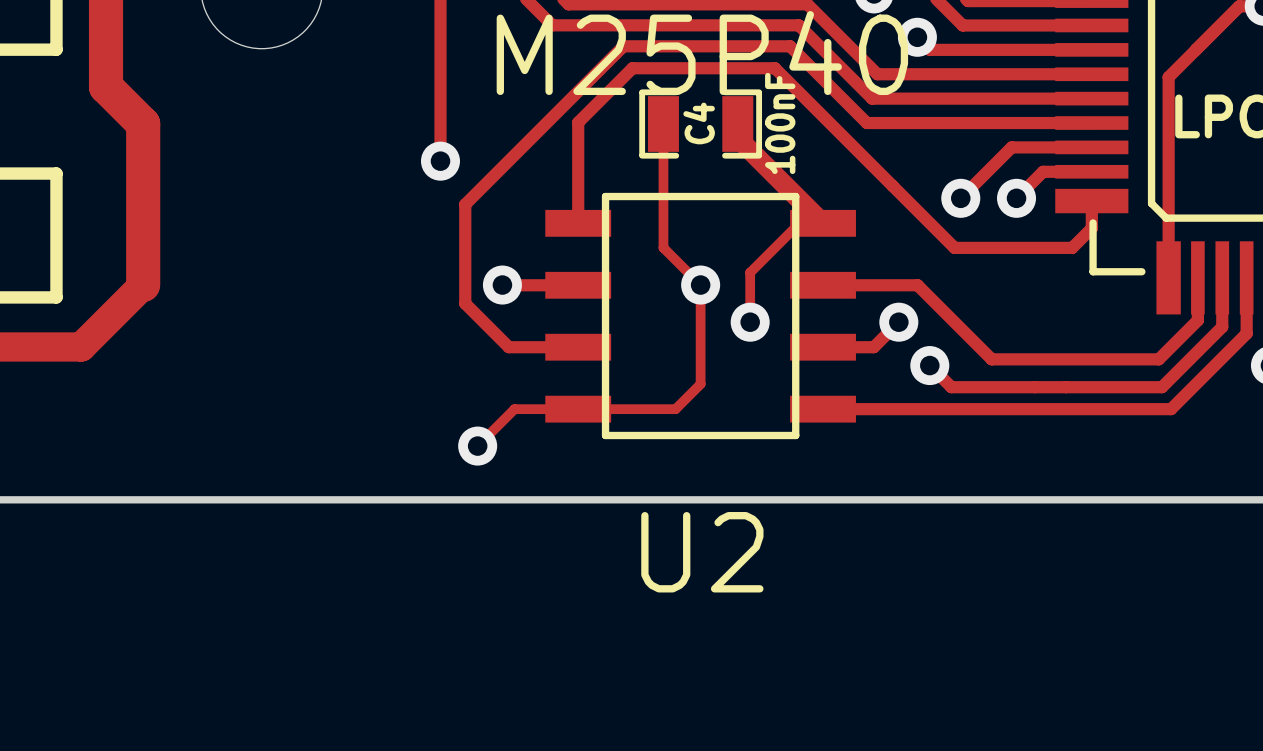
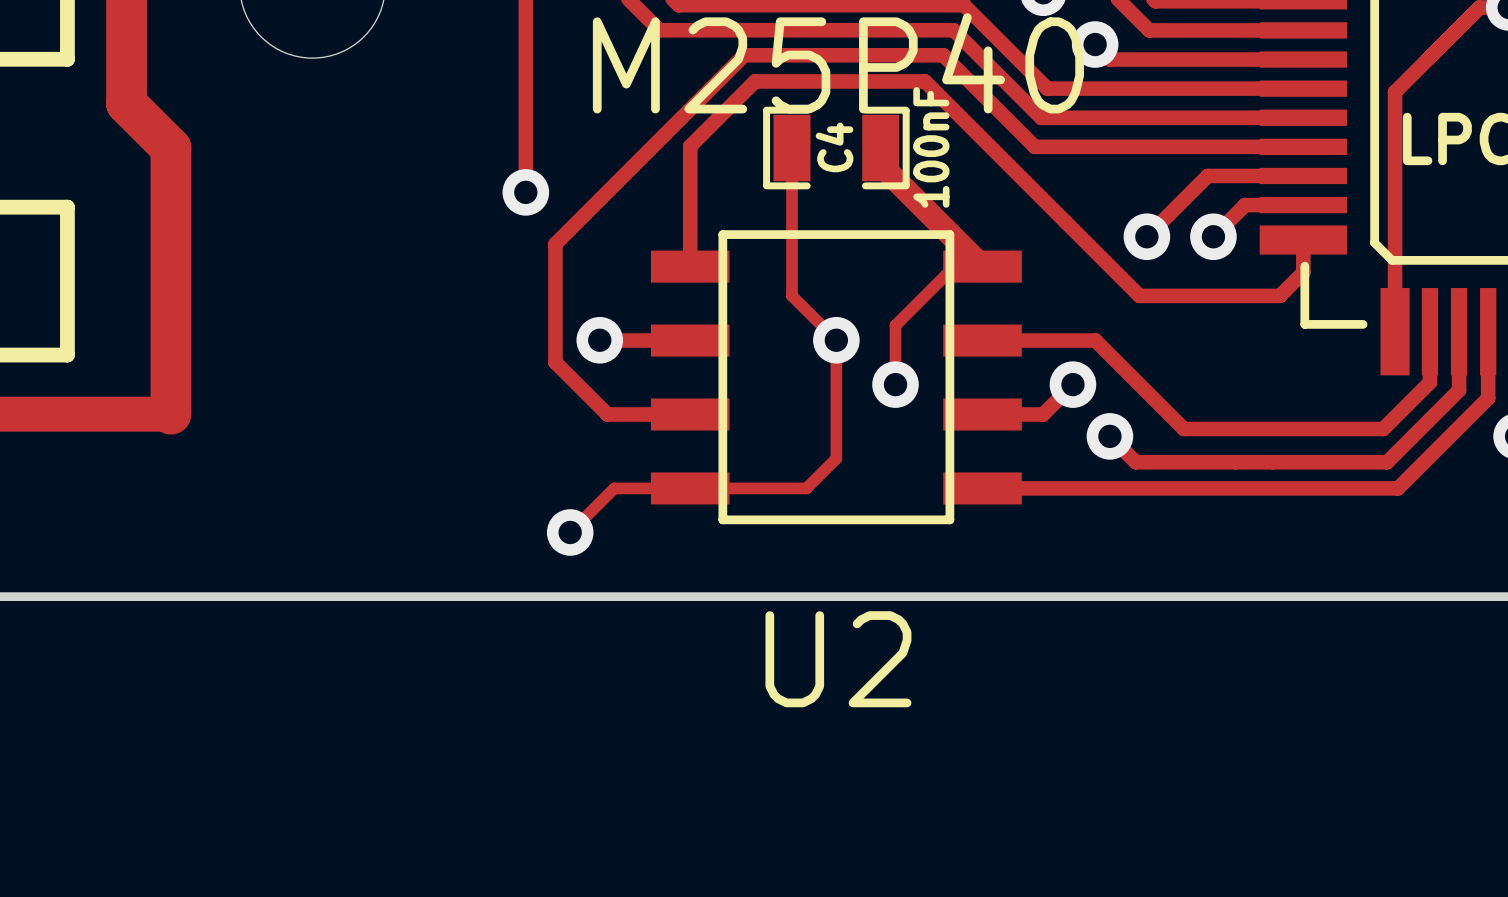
track: (143, 285) (81, 346) -> (170, 340) (170, 414) (96, 414)

